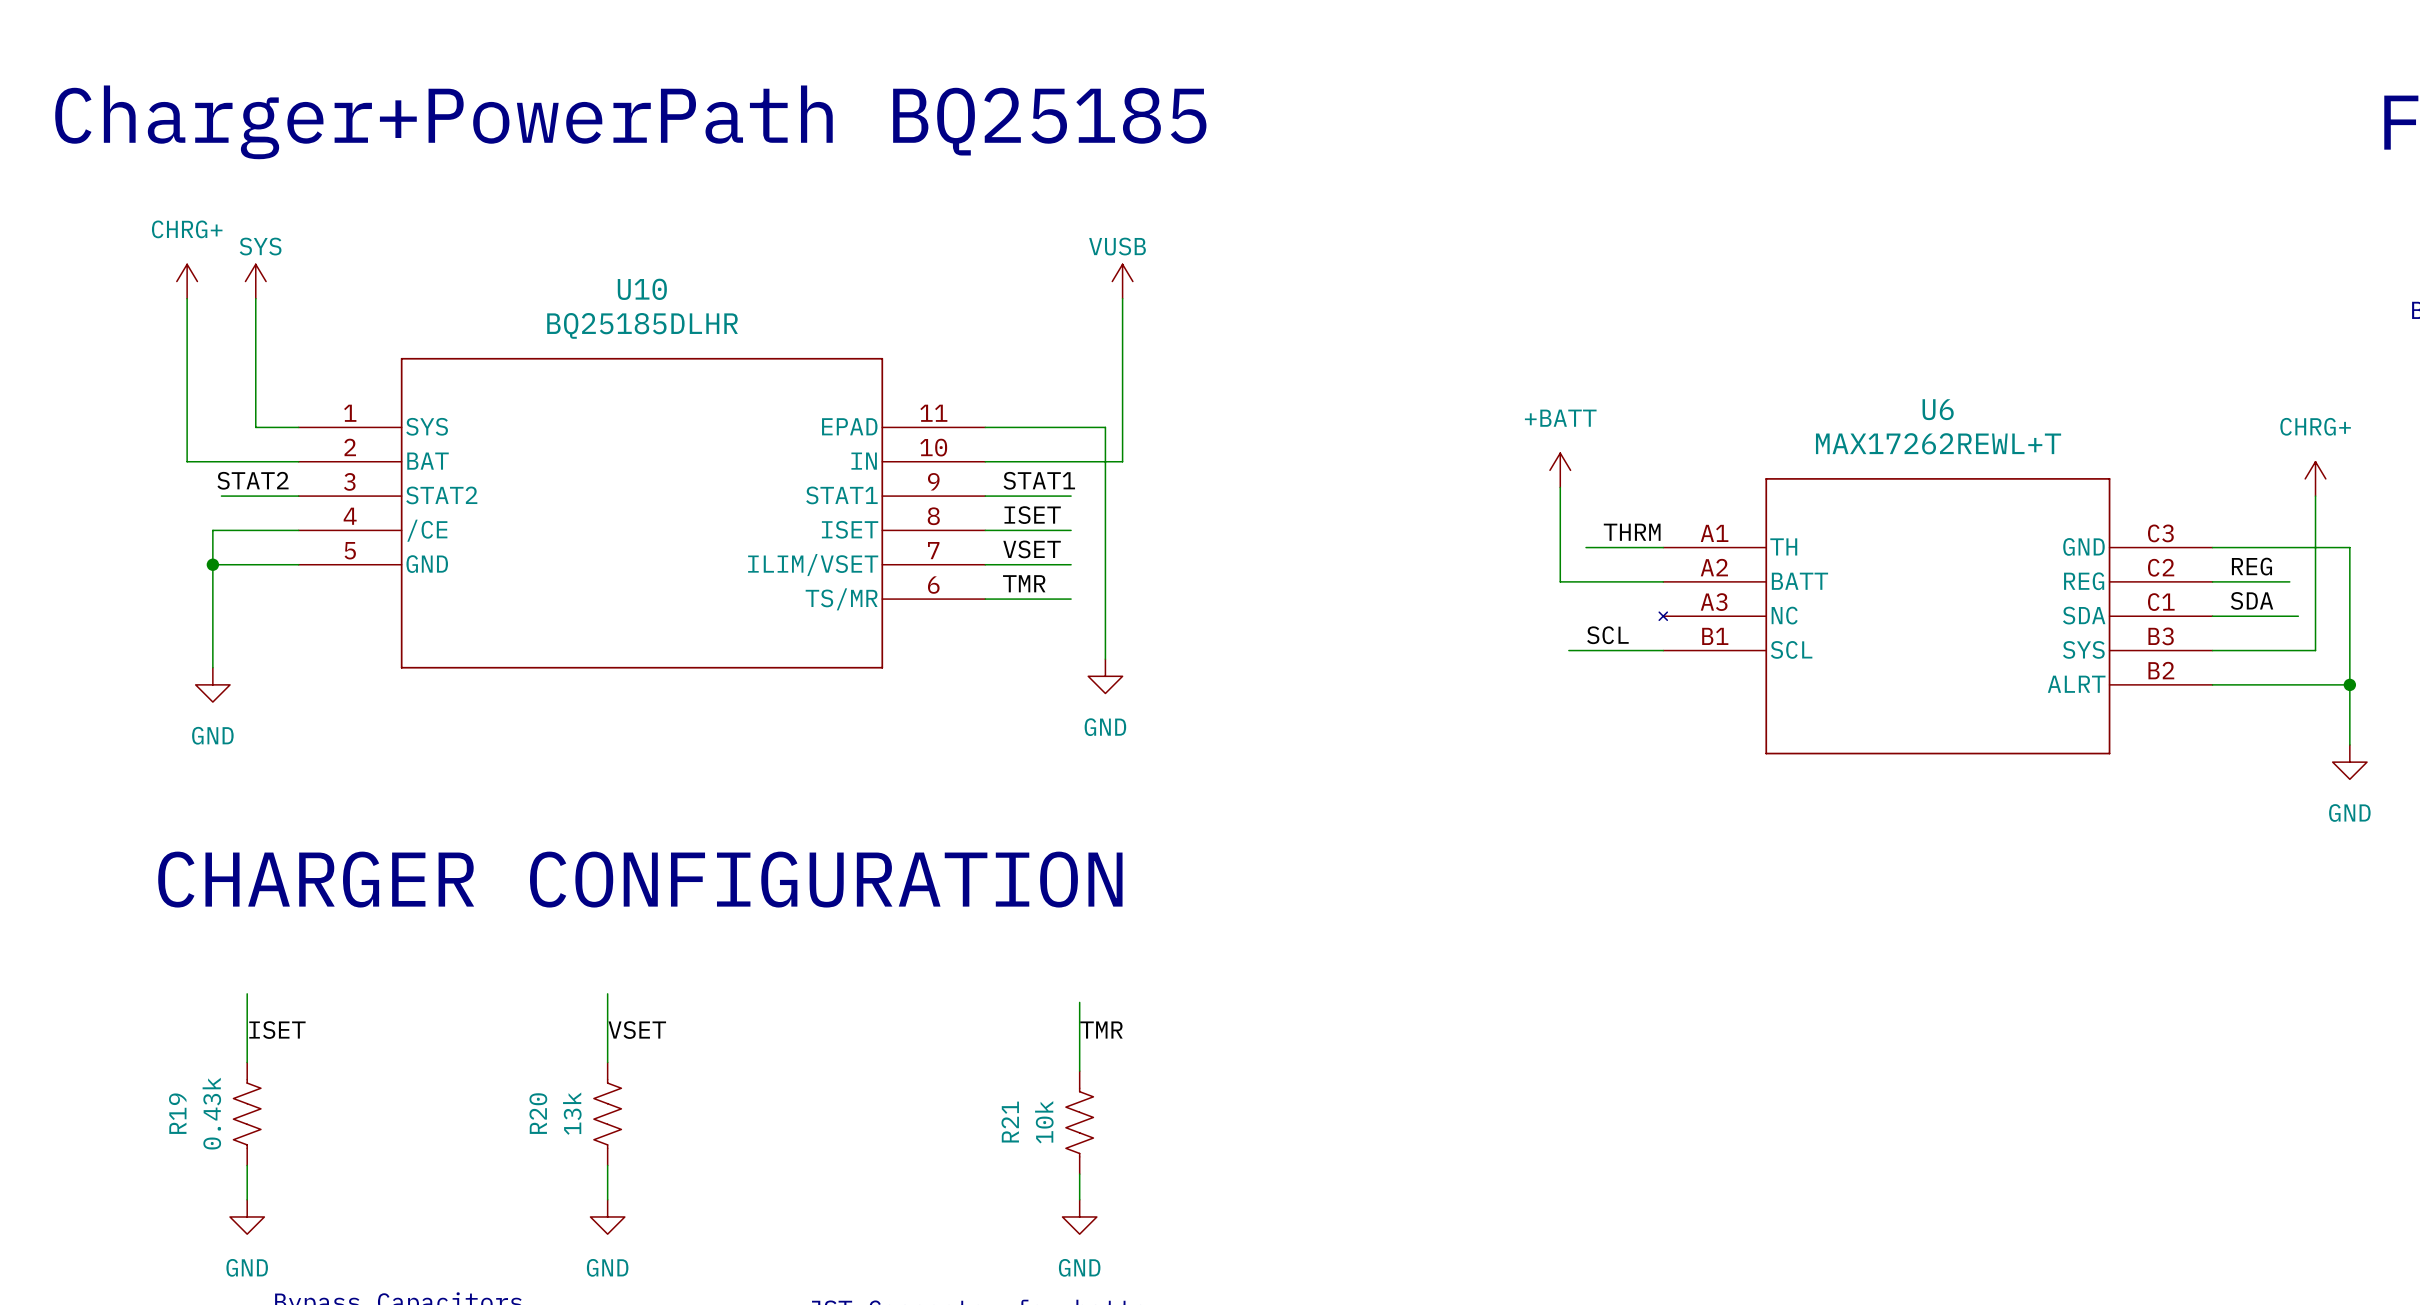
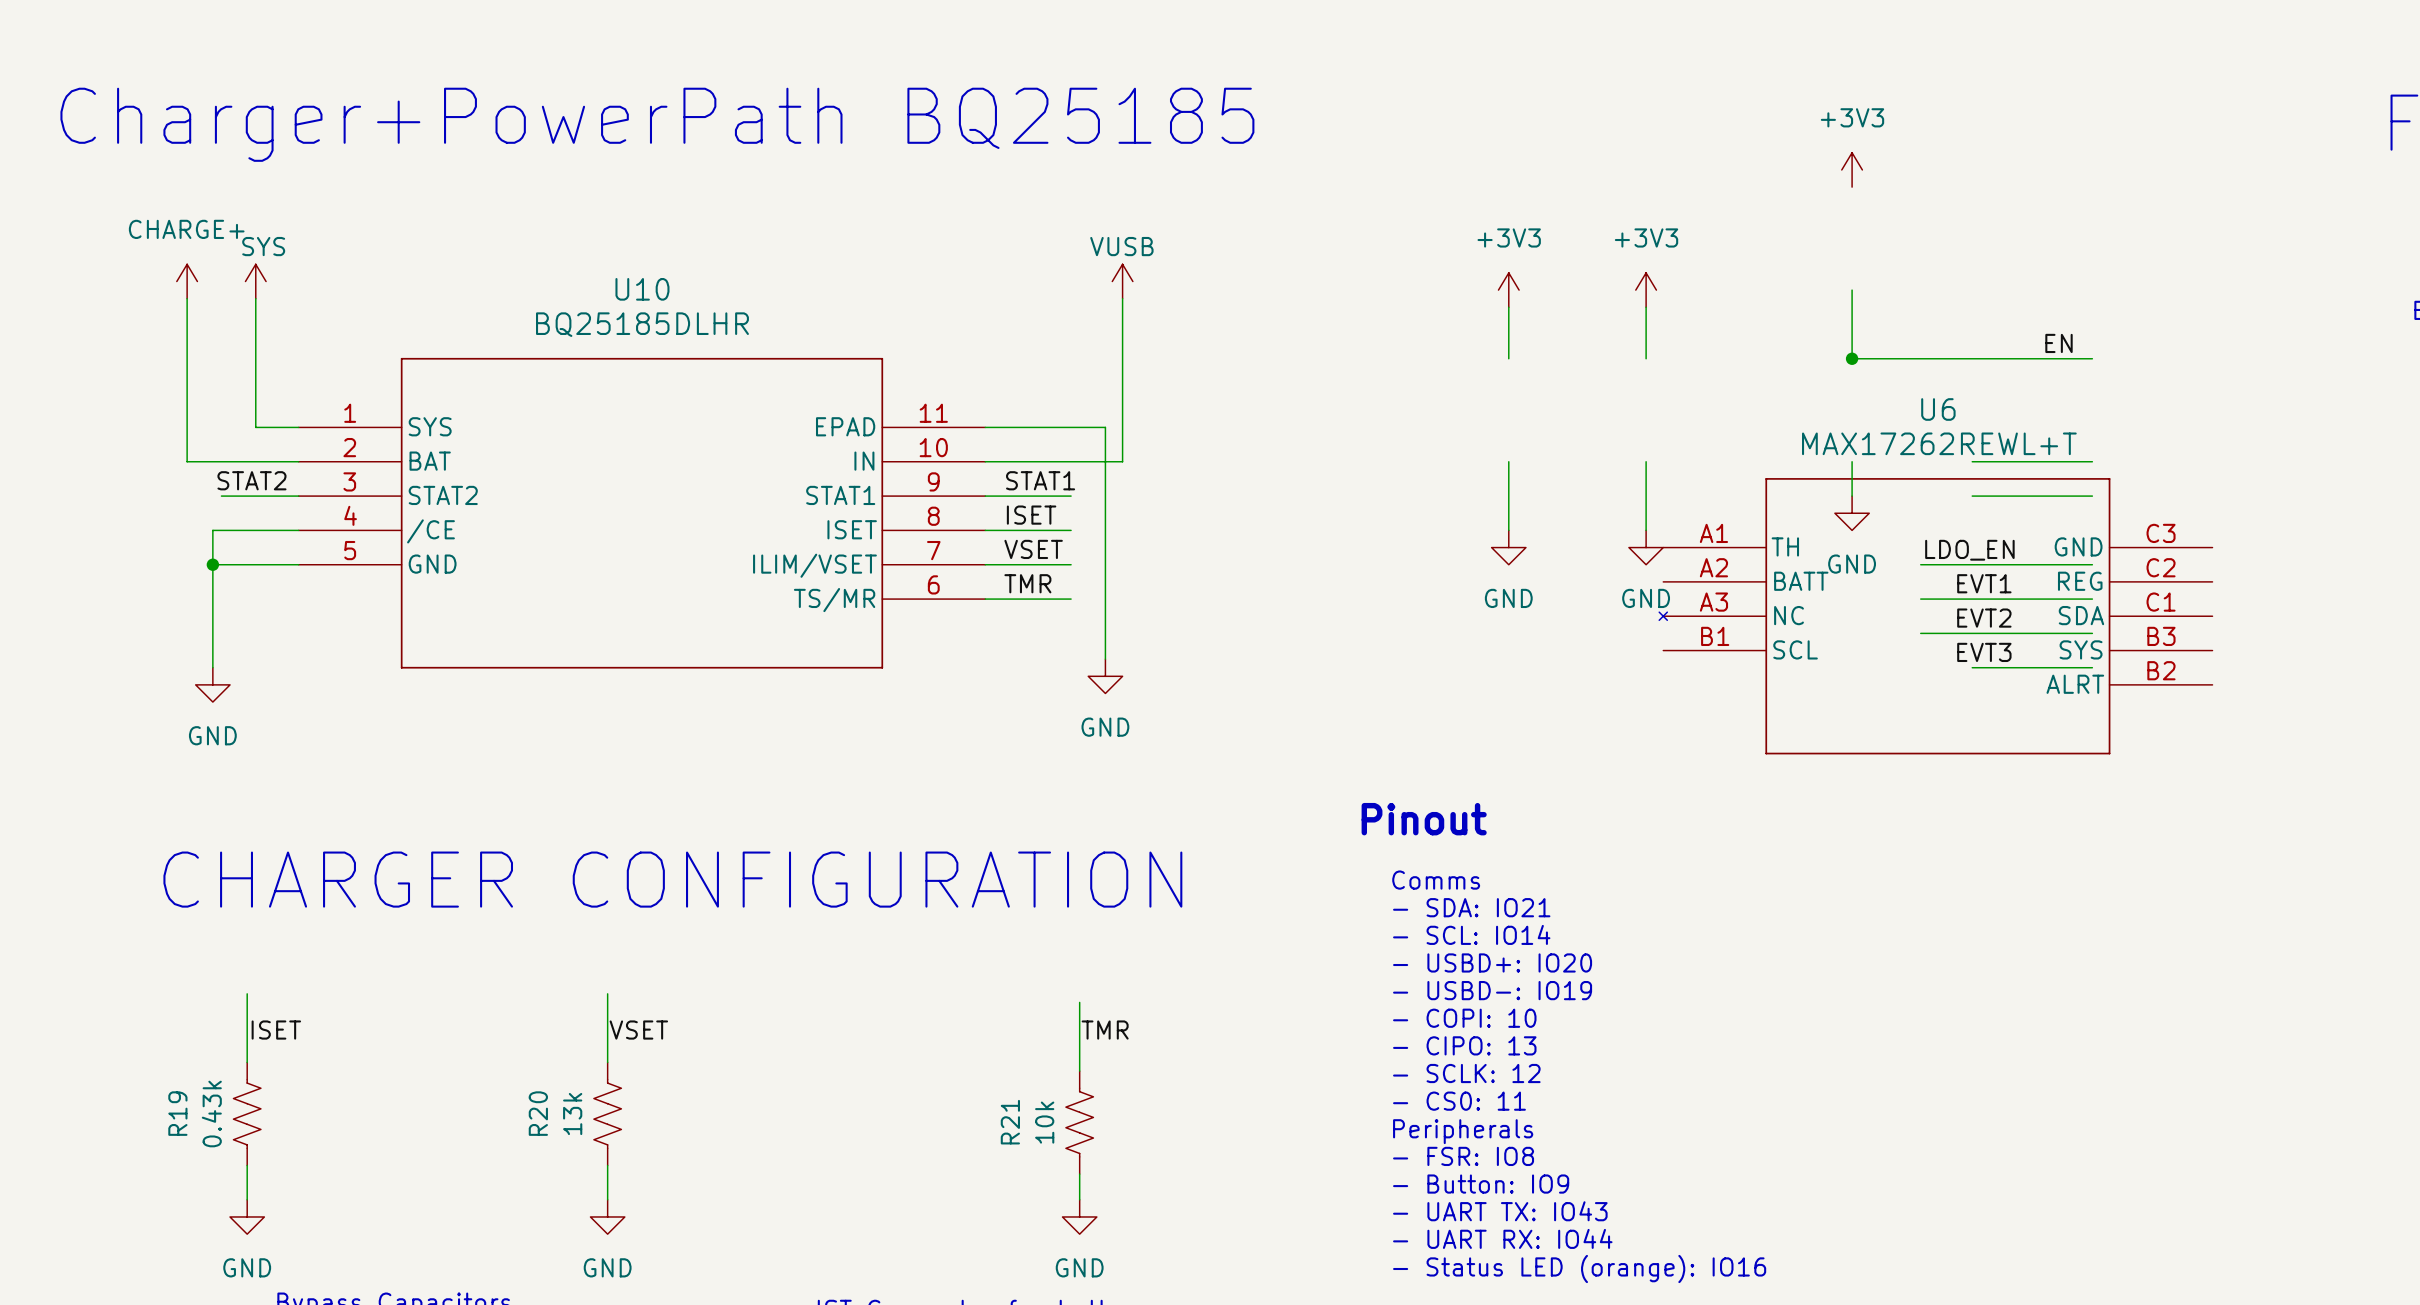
power symbol: none -> +3V3 (1852, 169)
power symbol: CHRG+ (187, 281) -> CHARGE+ (187, 281)
power symbol: none -> +3V3 (1508, 290)
power symbol: none -> +3V3 (1646, 290)
wire: none -> (1852, 290) (1852, 358) (2092, 358)
wire: none -> (1508, 307) (1508, 358)
wire: none -> (1646, 307) (1646, 358)
label: none -> EN (2058, 343)
junction: none -> (1852, 358)
wire: none -> (1508, 461) (1508, 530)
wire: none -> (1646, 461) (1646, 530)
wire: none -> (1852, 461) (1852, 496)
wire: none -> (1972, 461) (2092, 461)
power symbol: +BATT (1560, 470) -> none
power symbol: CHRG+ (2315, 478) -> none
wire: (1560, 487) (1560, 581) (1663, 581) -> none
wire: none -> (1972, 496) (2092, 496)
wire: (2315, 496) (2315, 650) (2212, 650) -> none
power symbol: none -> GND (1852, 513)
label: THRM (1632, 532) -> none
power symbol: none -> GND (1508, 547)
wire: (1586, 547) (1663, 547) -> none
power symbol: none -> GND (1646, 547)
wire: (2212, 547) (2349, 547) (2349, 744) -> none
label: none -> LDO_EN (1969, 550)
wire: none -> (1920, 564) (2092, 564)
label: REG (2251, 566) -> none
wire: (2212, 581) (2289, 581) -> none
label: none -> EVT1 (1984, 583)
wire: none -> (1920, 599) (2092, 599)
label: SDA (2252, 600) -> none
wire: (2212, 616) (2298, 616) -> none
label: none -> EVT2 (1984, 618)
wire: none -> (1920, 633) (2092, 633)
label: SCL (1607, 635) -> none
wire: (1568, 650) (1663, 650) -> none
label: none -> EVT3 (1984, 652)
wire: none -> (1972, 667) (2092, 667)
wire: (2212, 684) (2349, 684) -> none
junction: (2349, 684) -> none
power symbol: GND (2349, 762) -> none
text: none -> Pinout (1424, 819)
text: none -> Comms (1436, 880)
text: none -> - SDA: IO21 (1471, 907)
text: none -> - SCL: IO14 (1471, 934)
text: none -> - USBD+: IO20 (1492, 962)
text: none -> - USBD-: IO19 (1492, 990)
text: none -> - COPI: 10 (1464, 1018)
text: none -> - CIPO: 13 (1464, 1045)
text: none -> - SCLK: 12 (1466, 1073)
text: none -> - CS0: 11 (1459, 1101)
text: none -> Peripherals (1463, 1131)
text: none -> - FSR: IO8 (1463, 1156)
text: none -> - Button: IO9 (1481, 1184)
text: none -> - UART TX: IO43 (1500, 1211)
text: none -> - UART RX: IO44 (1502, 1238)
text: none -> - Status LED (orange): IO16 (1579, 1268)

